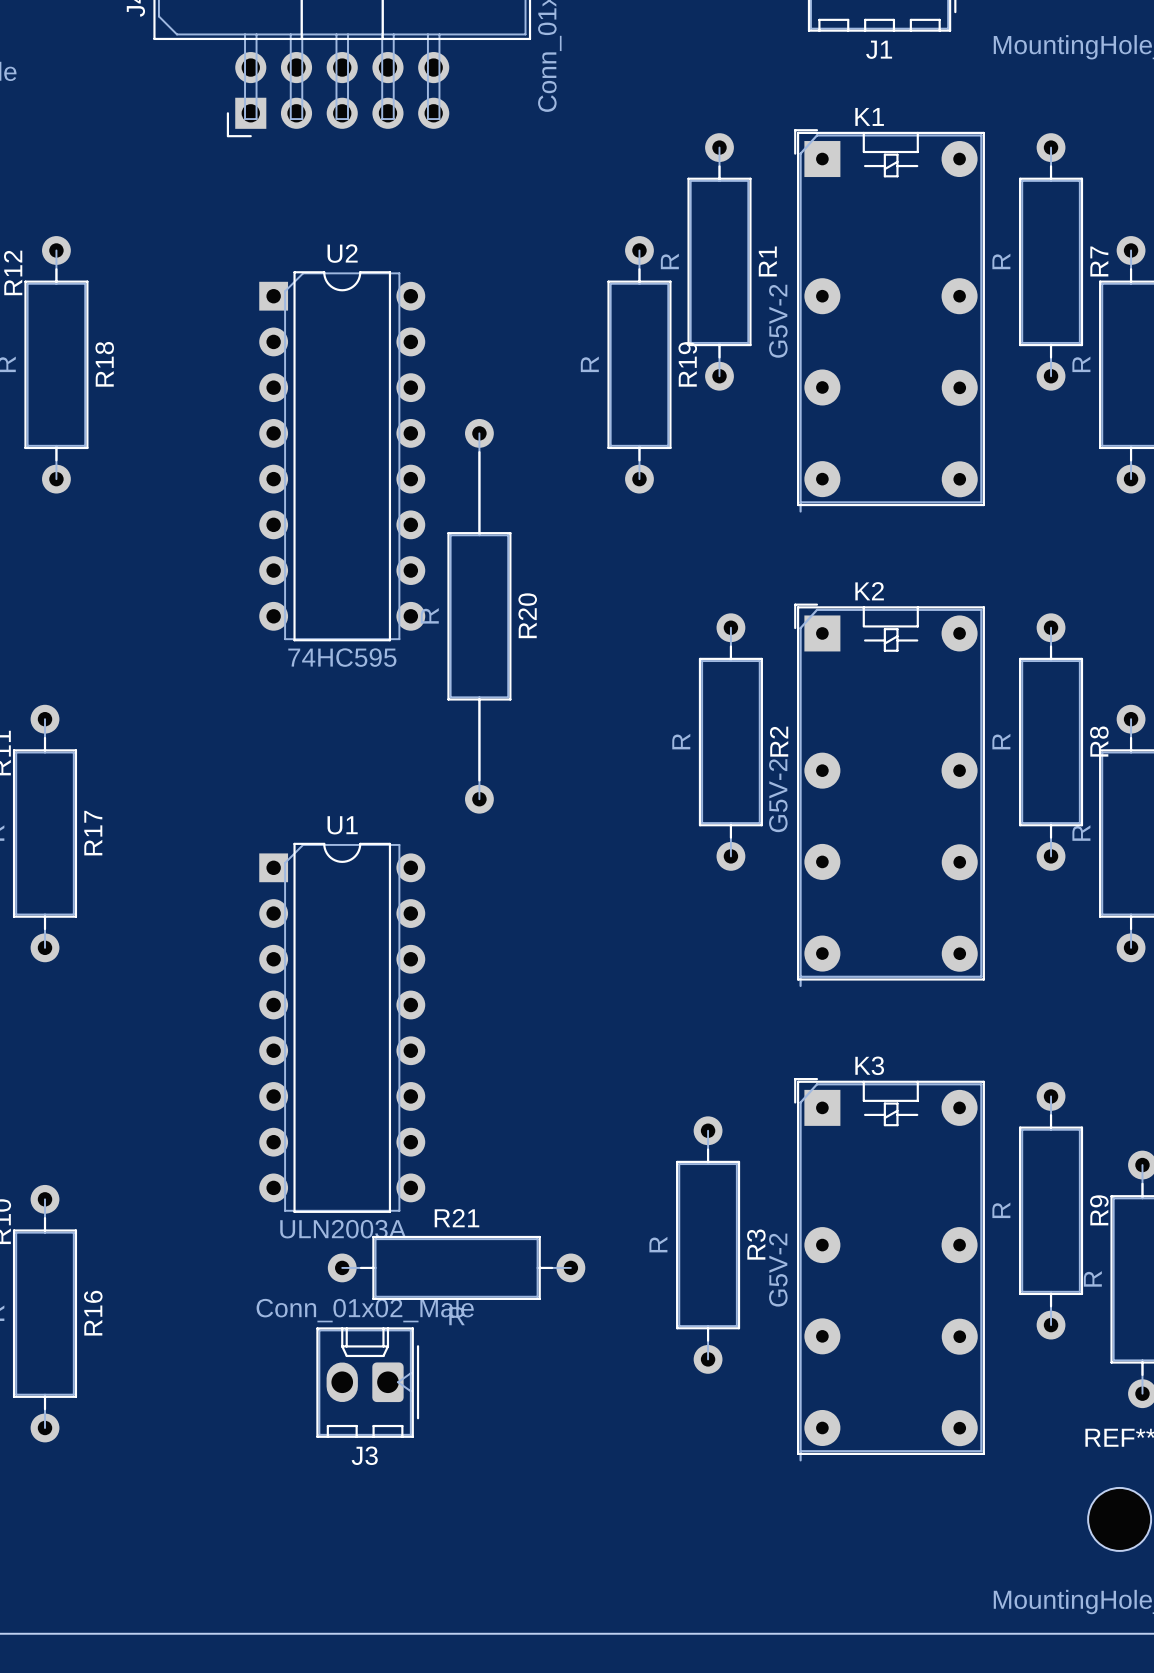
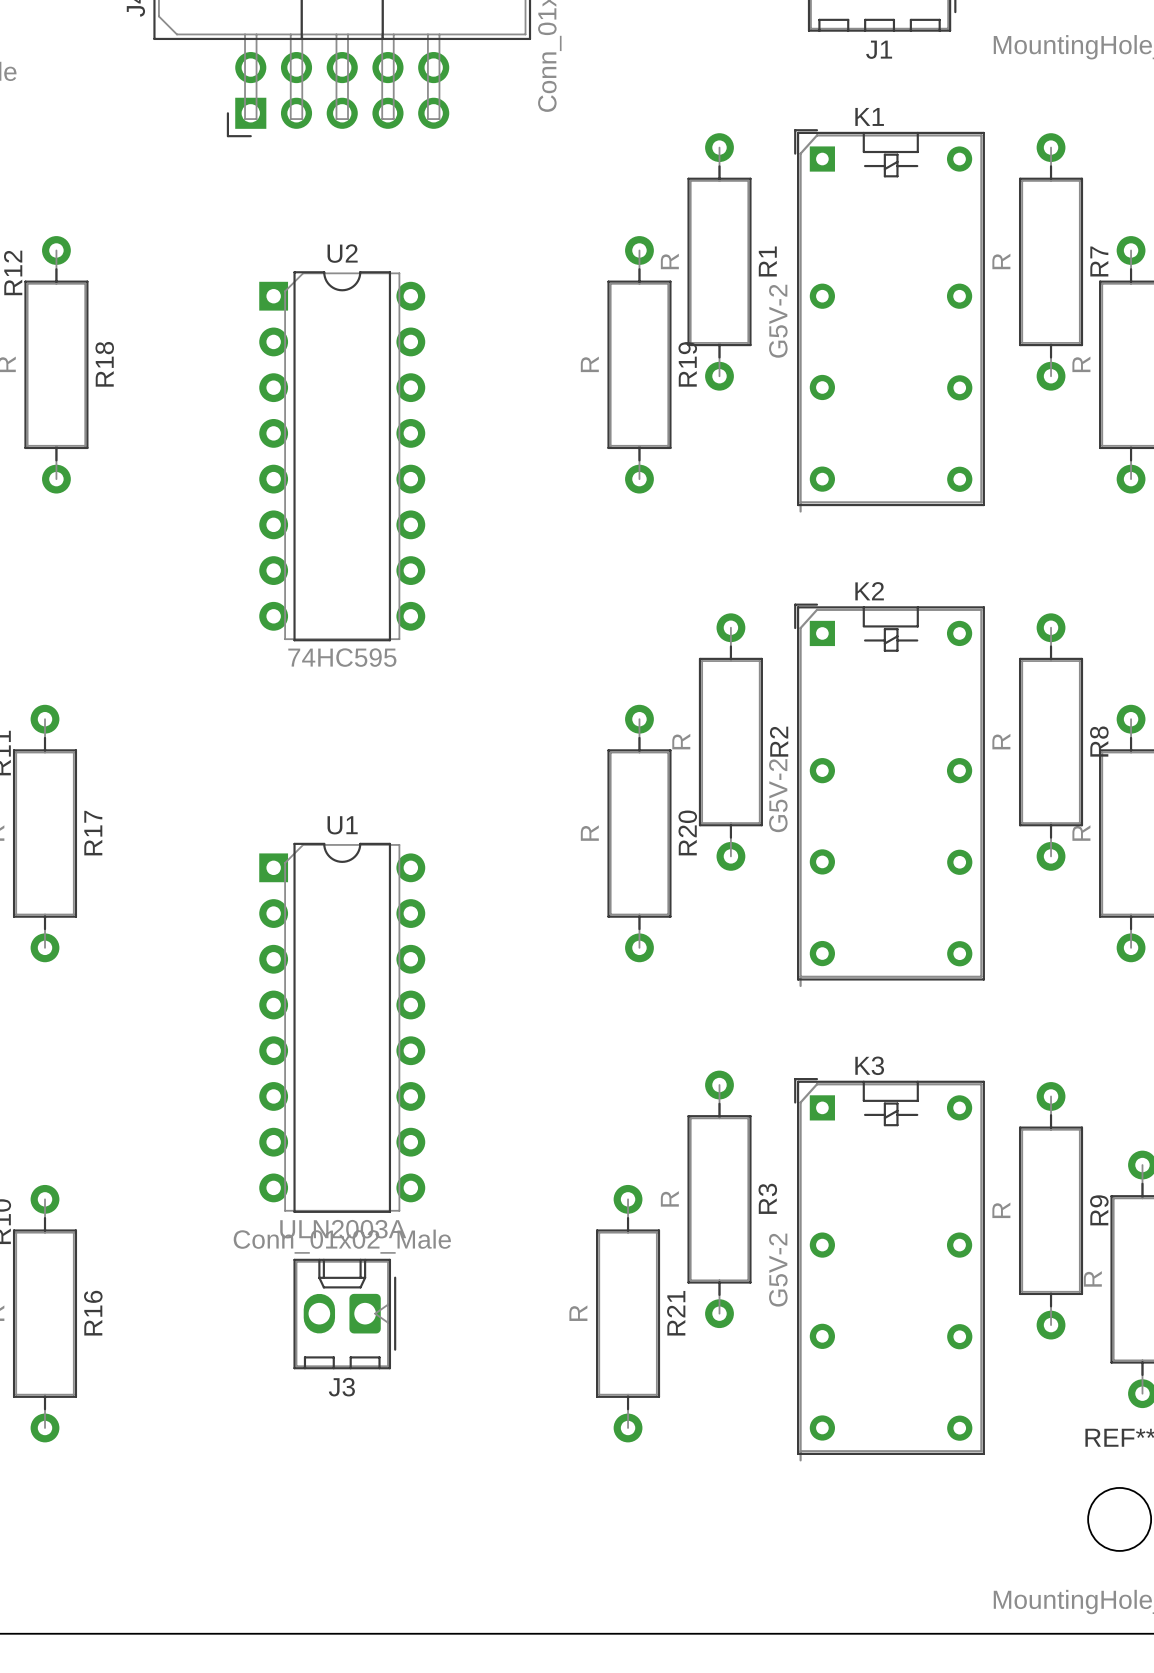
K1 footprint: [794, 129, 985, 513] -> [794, 129, 985, 513]
R20 footprint: [447, 418, 512, 814] -> [607, 704, 672, 963]
K2 footprint: [794, 603, 985, 988] -> [794, 603, 985, 988]
K3 footprint: [794, 1078, 985, 1462] -> [794, 1078, 985, 1462]
R3 position: (708, 1245) -> (719, 1199)
R21 rotation: 0° (456, 1267) -> 90° clockwise (628, 1313)
R21 position: (456, 1267) -> (628, 1313)
J3 position: (367, 1382) -> (344, 1314)

